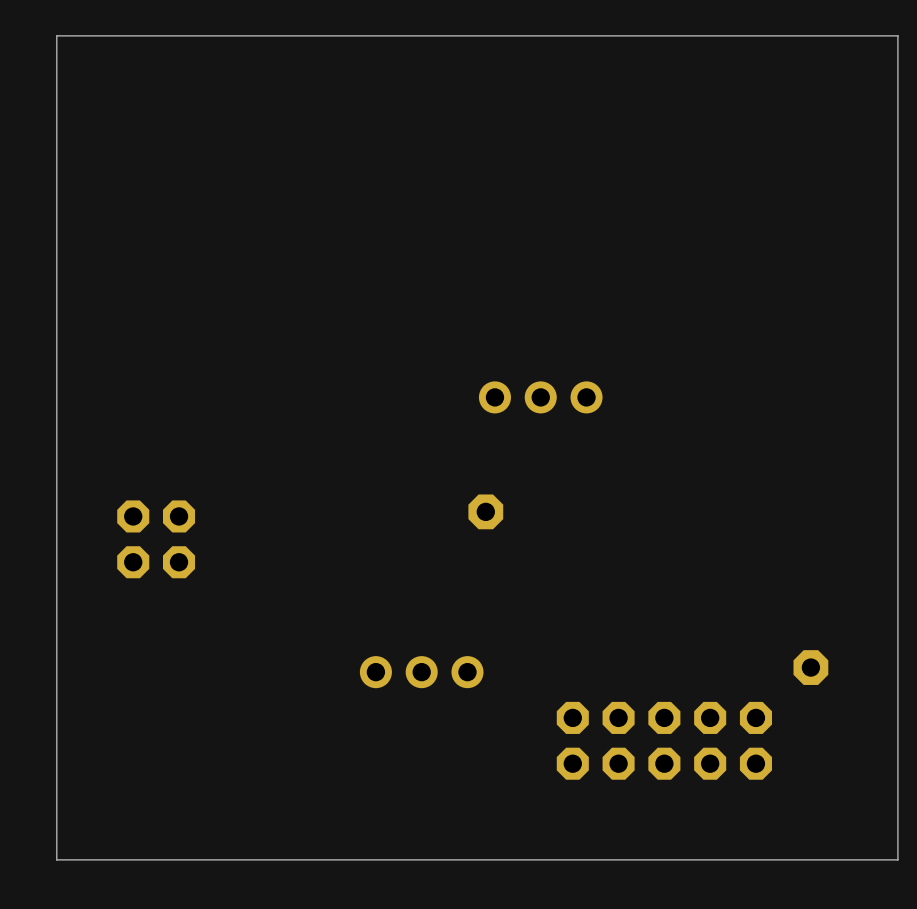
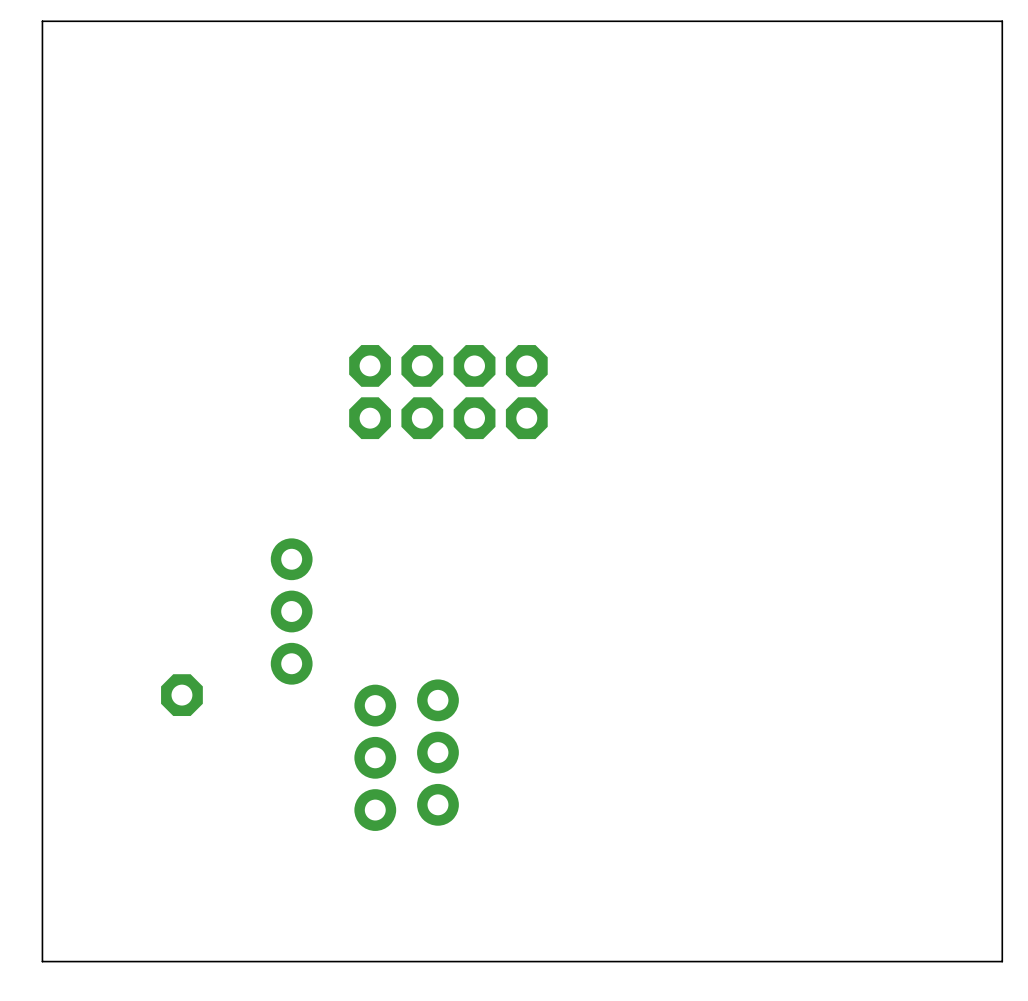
part: none -> (448, 392)
part: (540, 397) -> none
part: (485, 511) -> none
part: (156, 539) -> none
part: none -> (291, 611)
part: none -> (181, 695)
part: (810, 667) -> none
part: (421, 672) -> none
part: none -> (437, 752)
part: none -> (375, 757)
part: (664, 740) -> none

